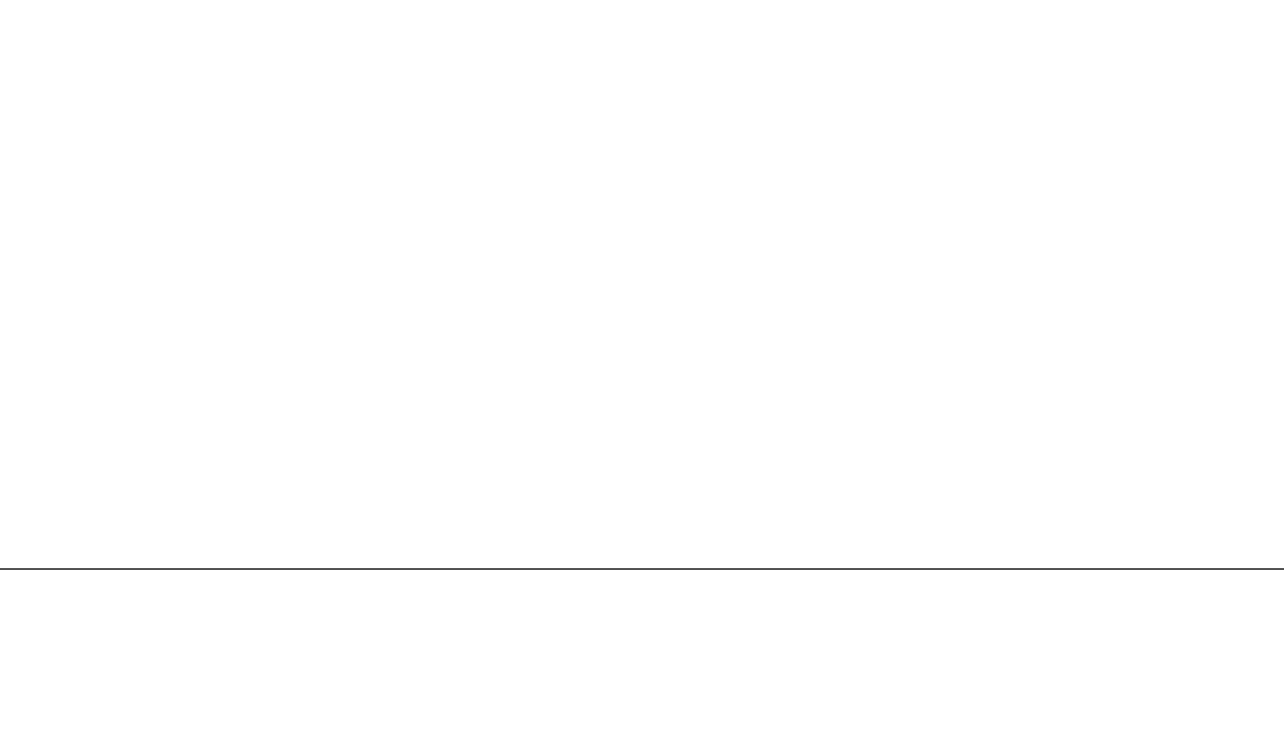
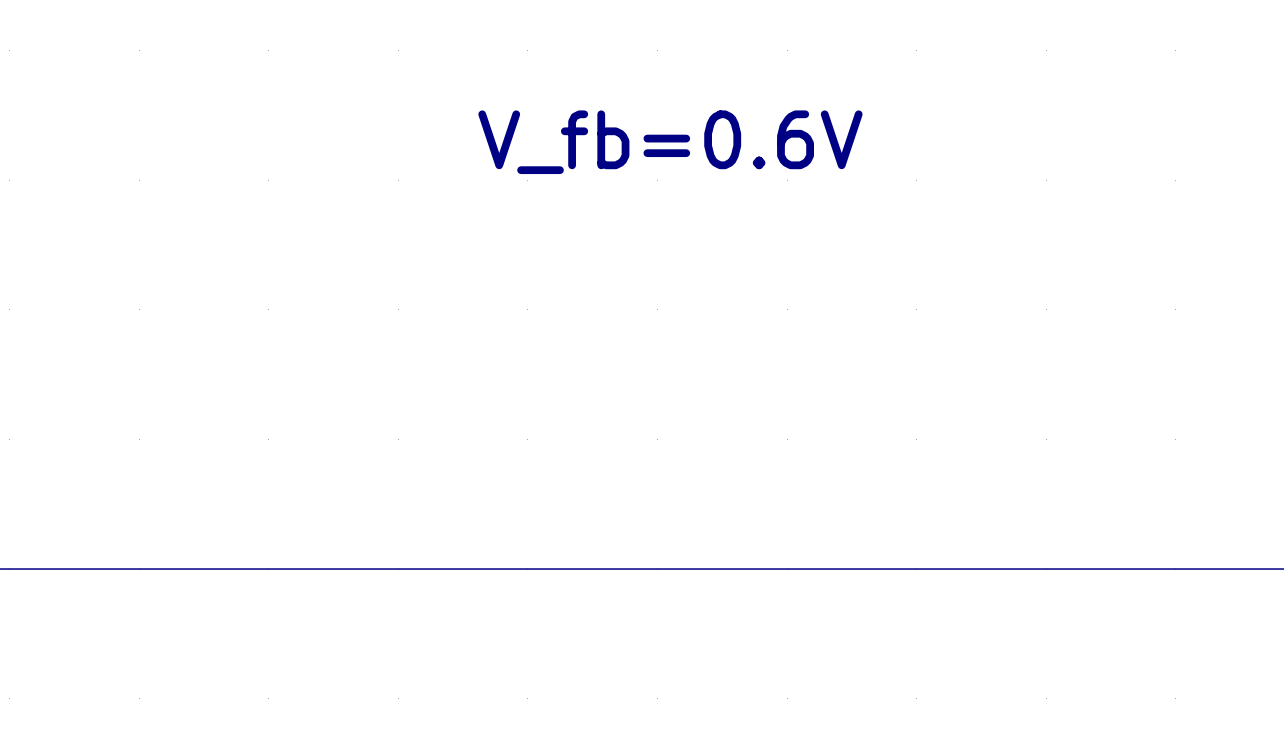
text: none -> V_fb=0.6V (670, 142)

